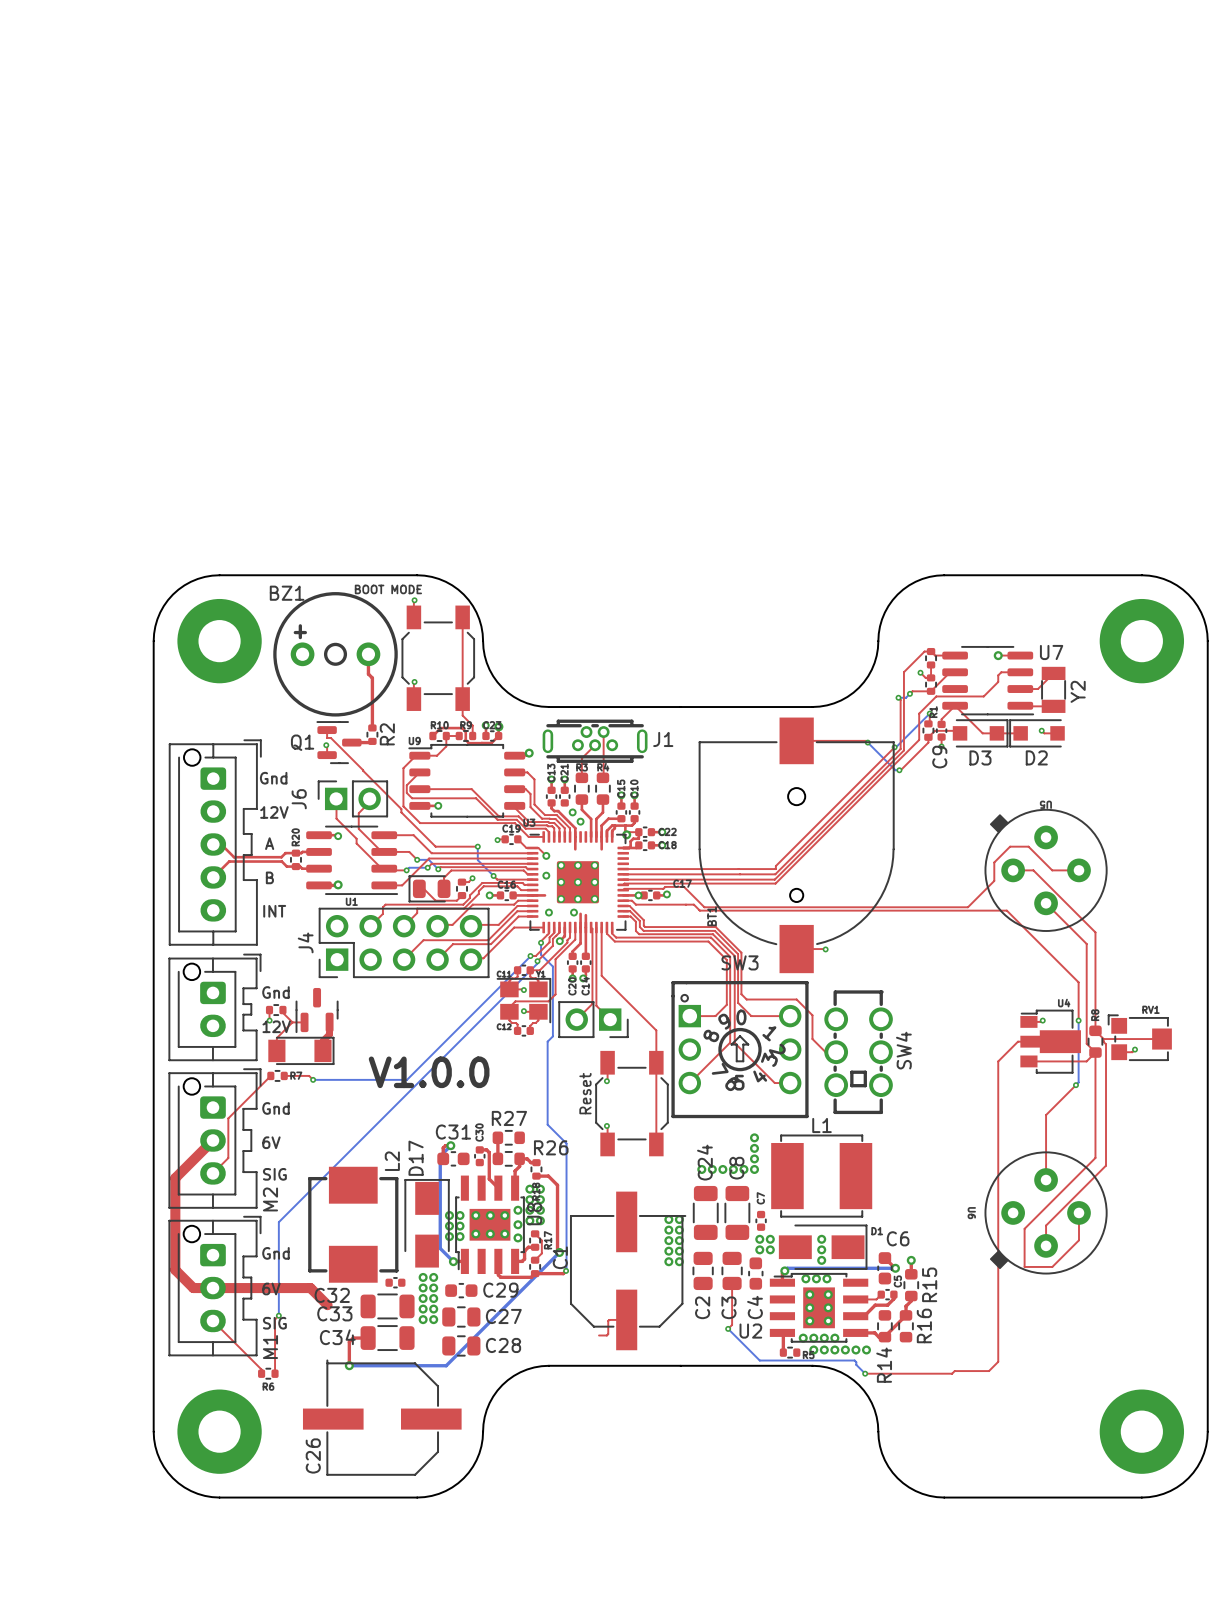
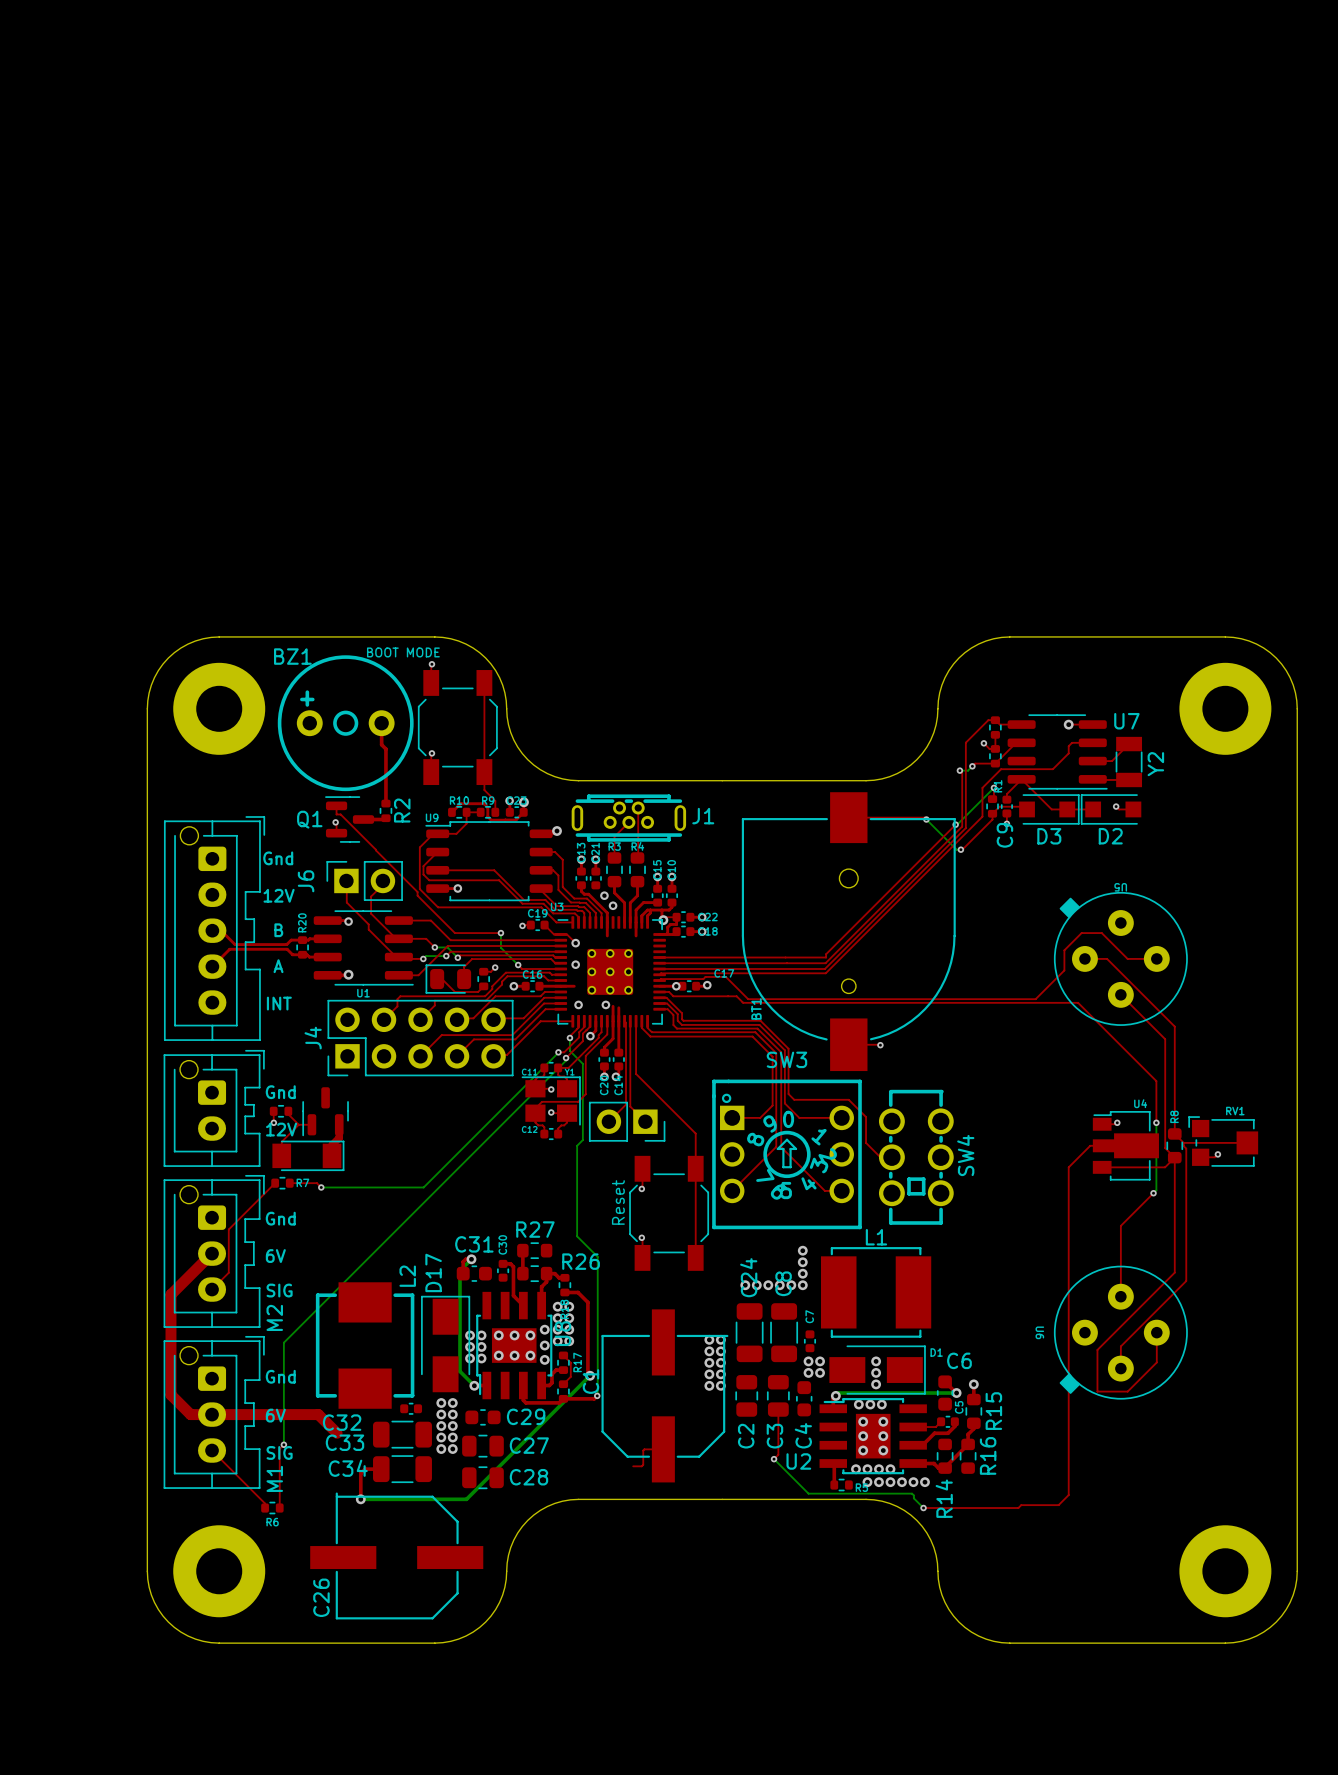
text: A (269, 843) -> B (278, 930)
text: B (269, 877) -> A (278, 966)
text: V1.0.0 (429, 1072) -> none

